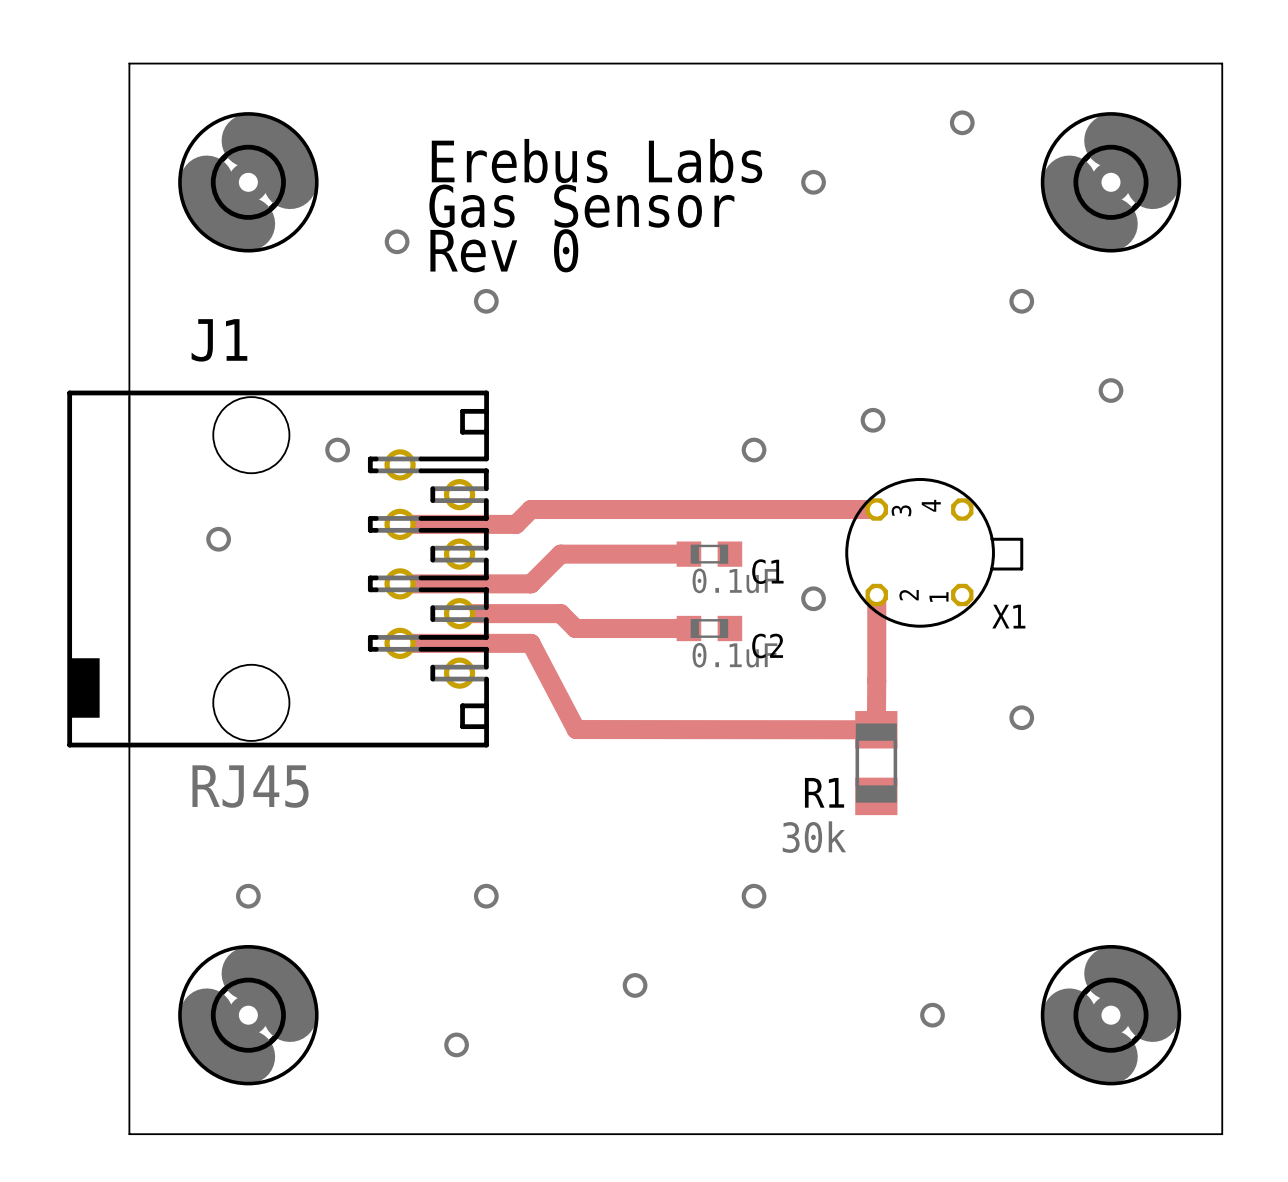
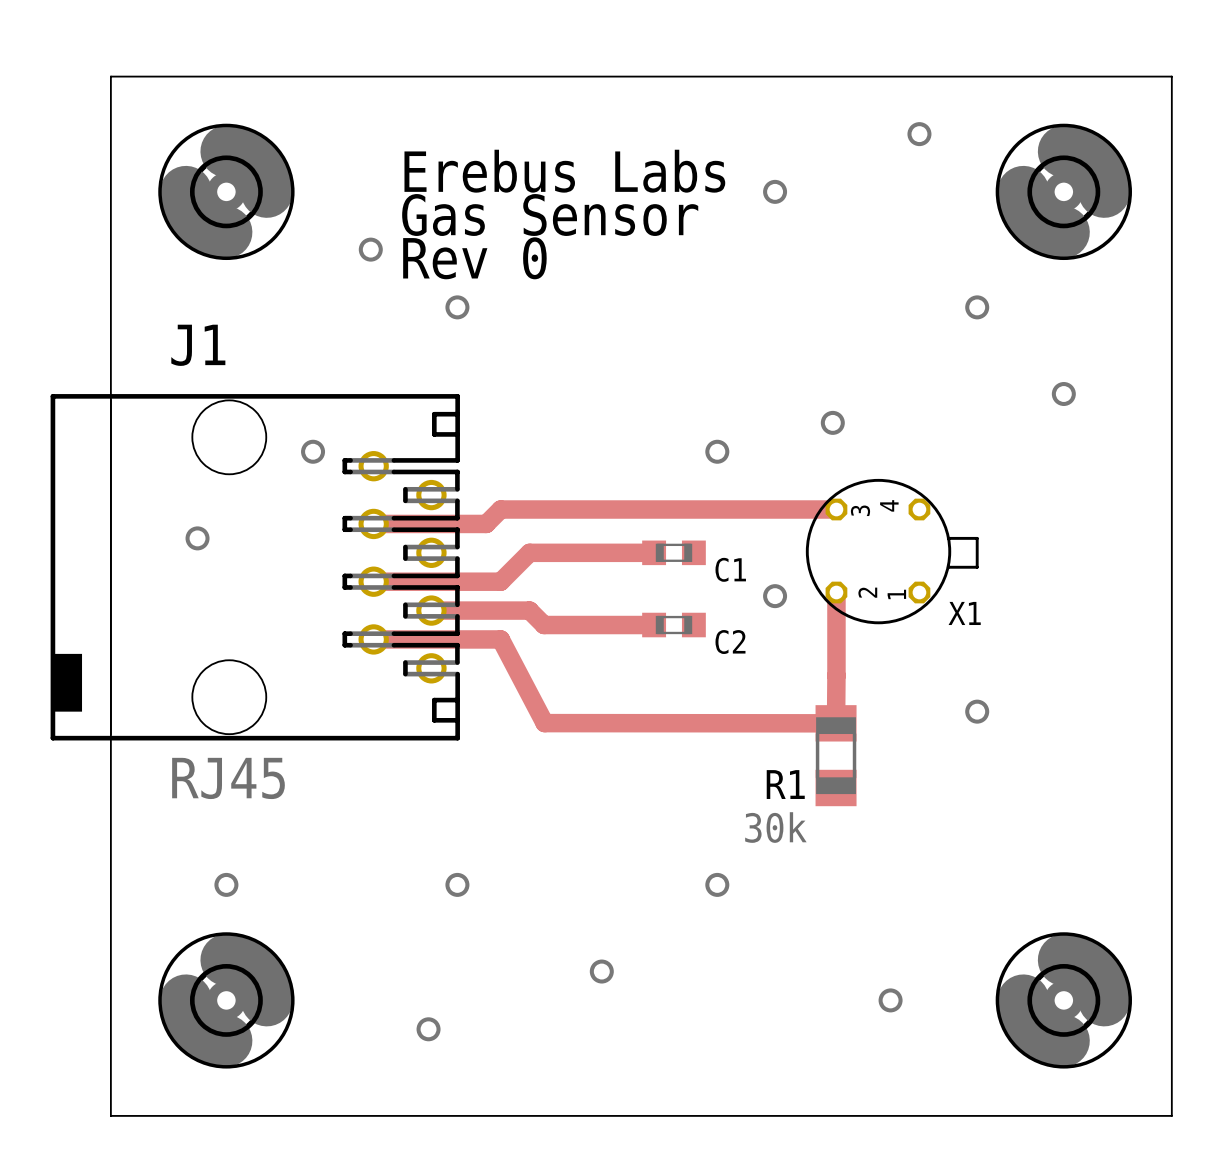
C1 value: 0.1uF (734, 580) -> none
C2 value: 0.1uF (734, 655) -> none

